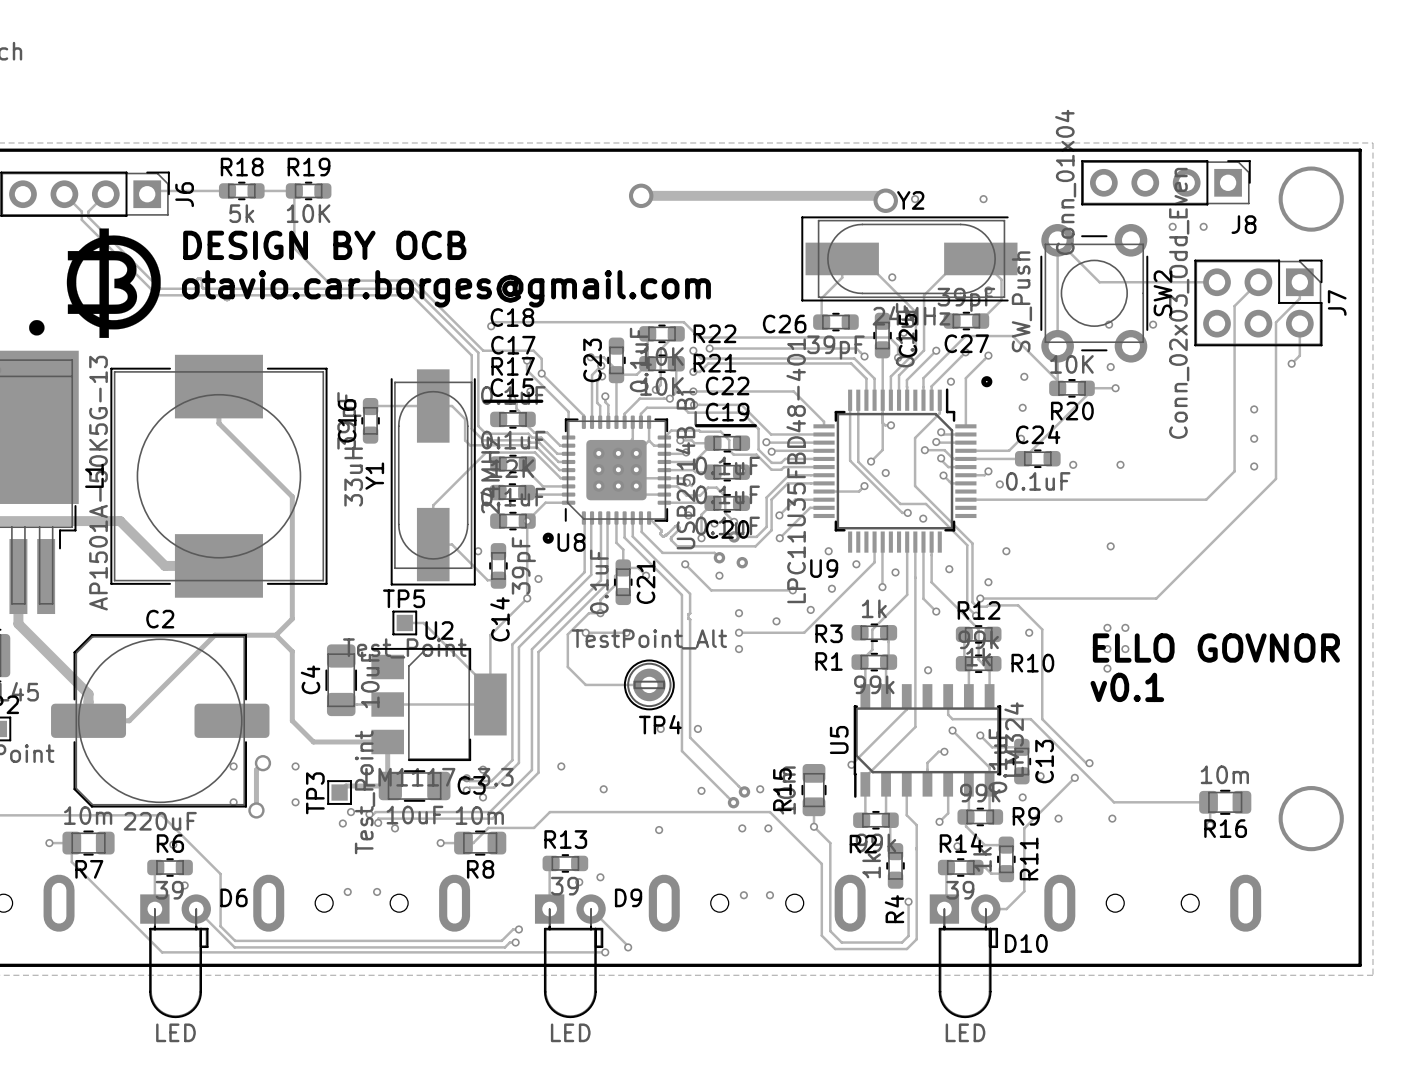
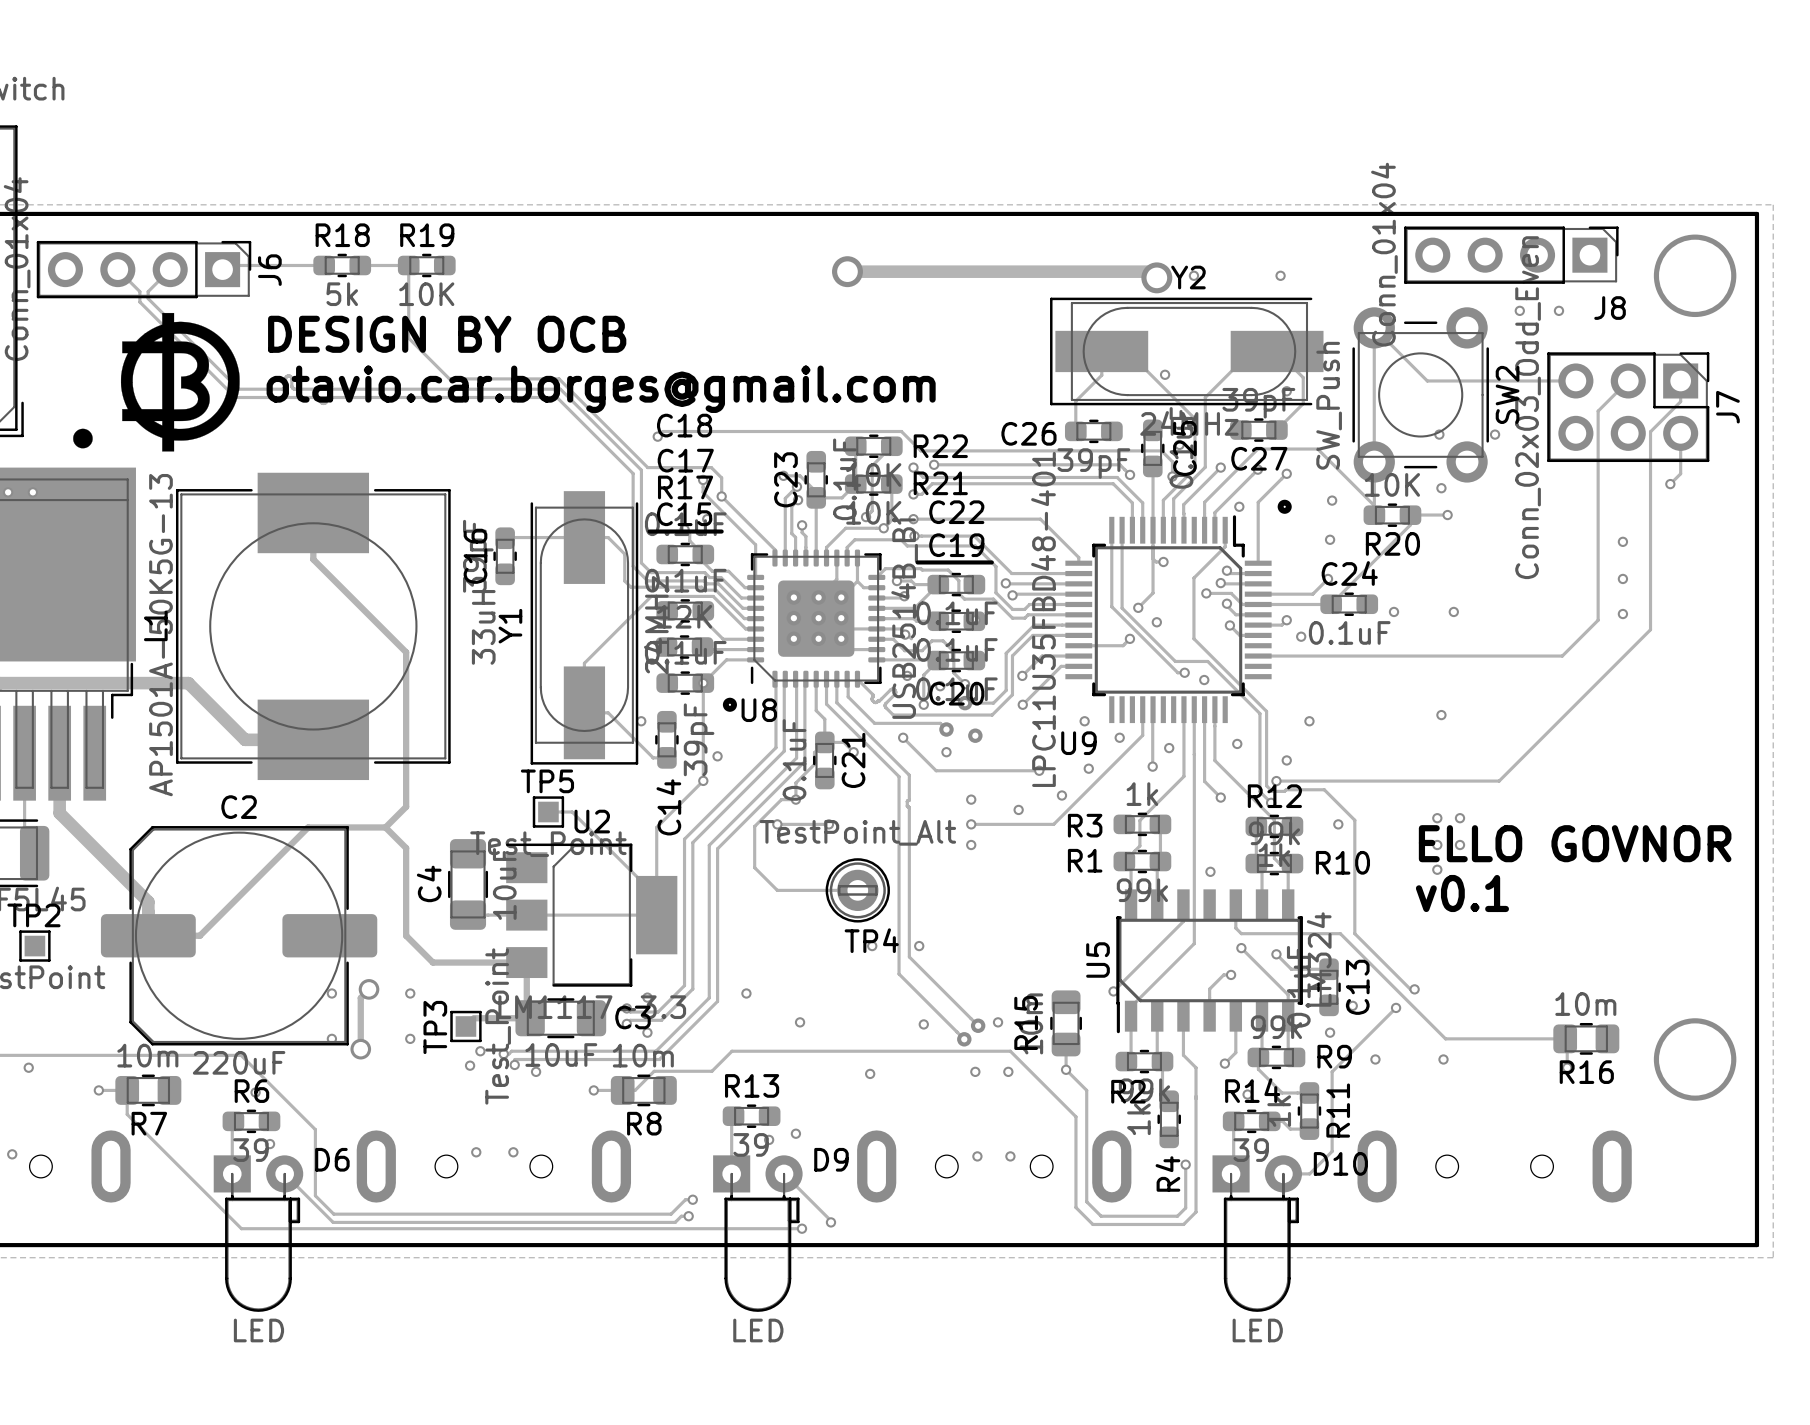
D10 name position: D10 (1026, 943) -> D10 (1340, 1163)

